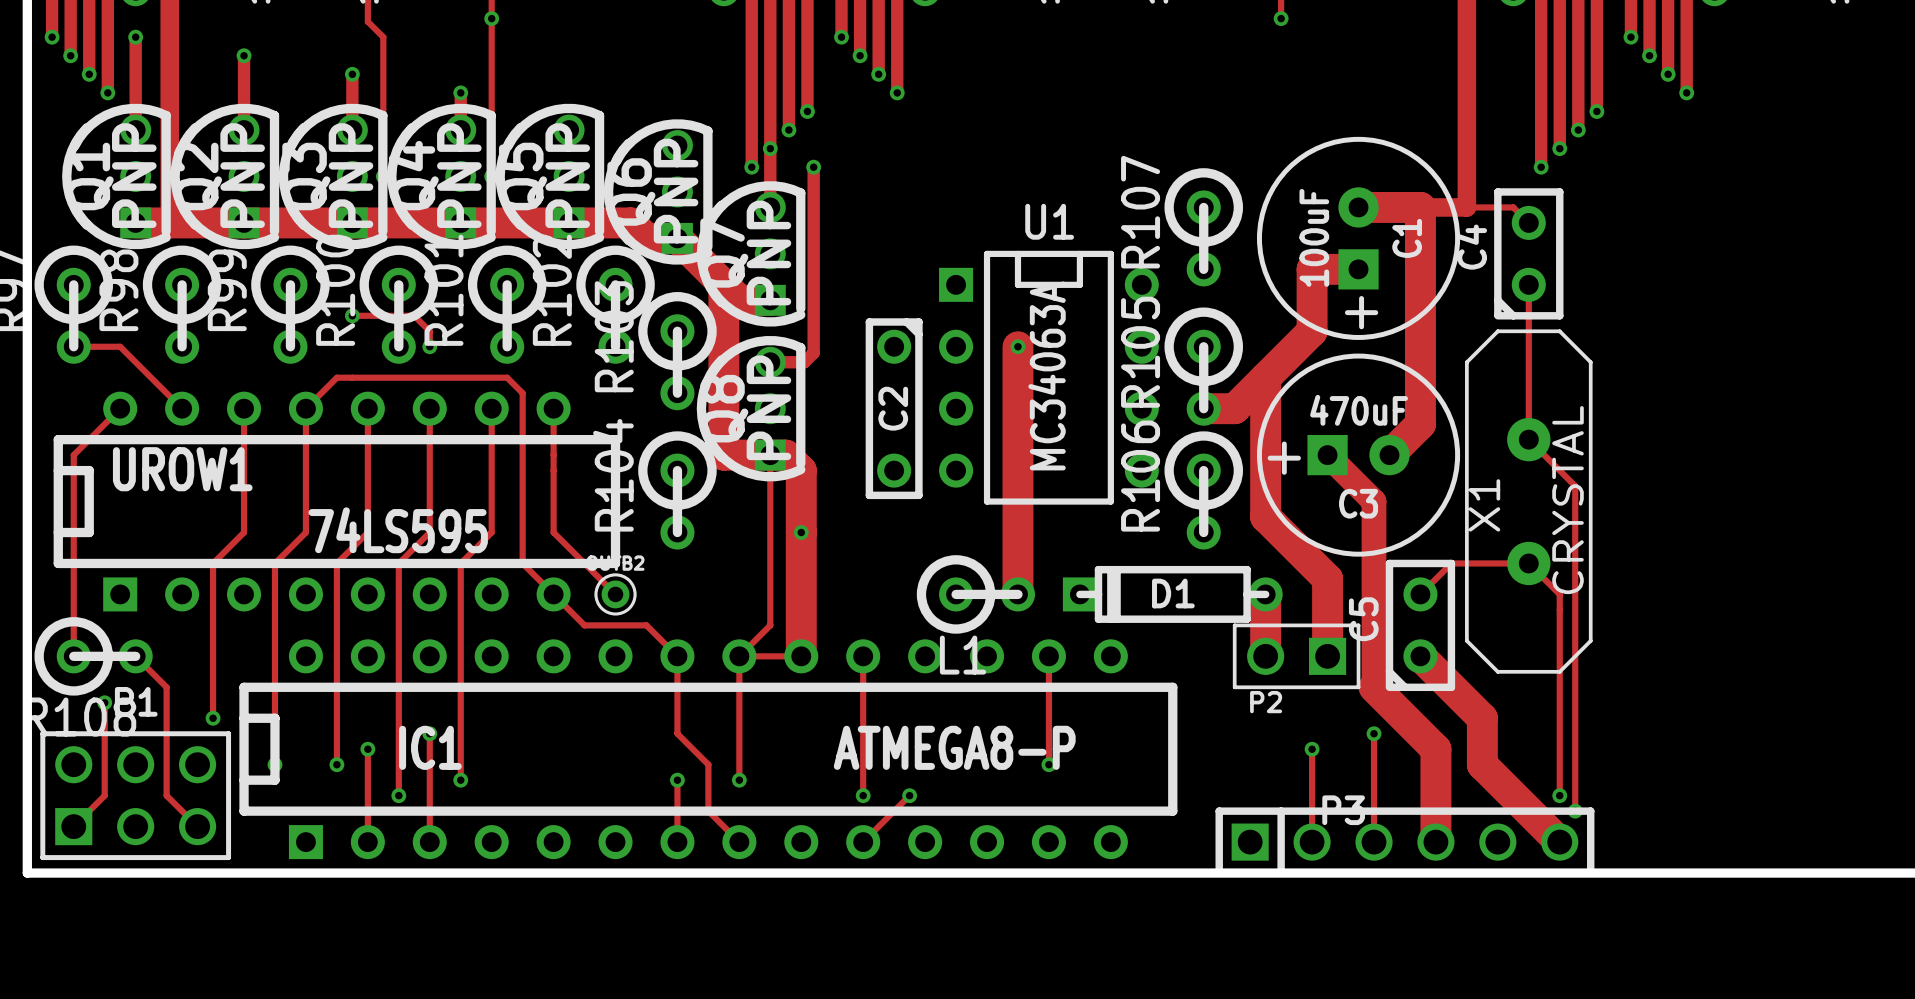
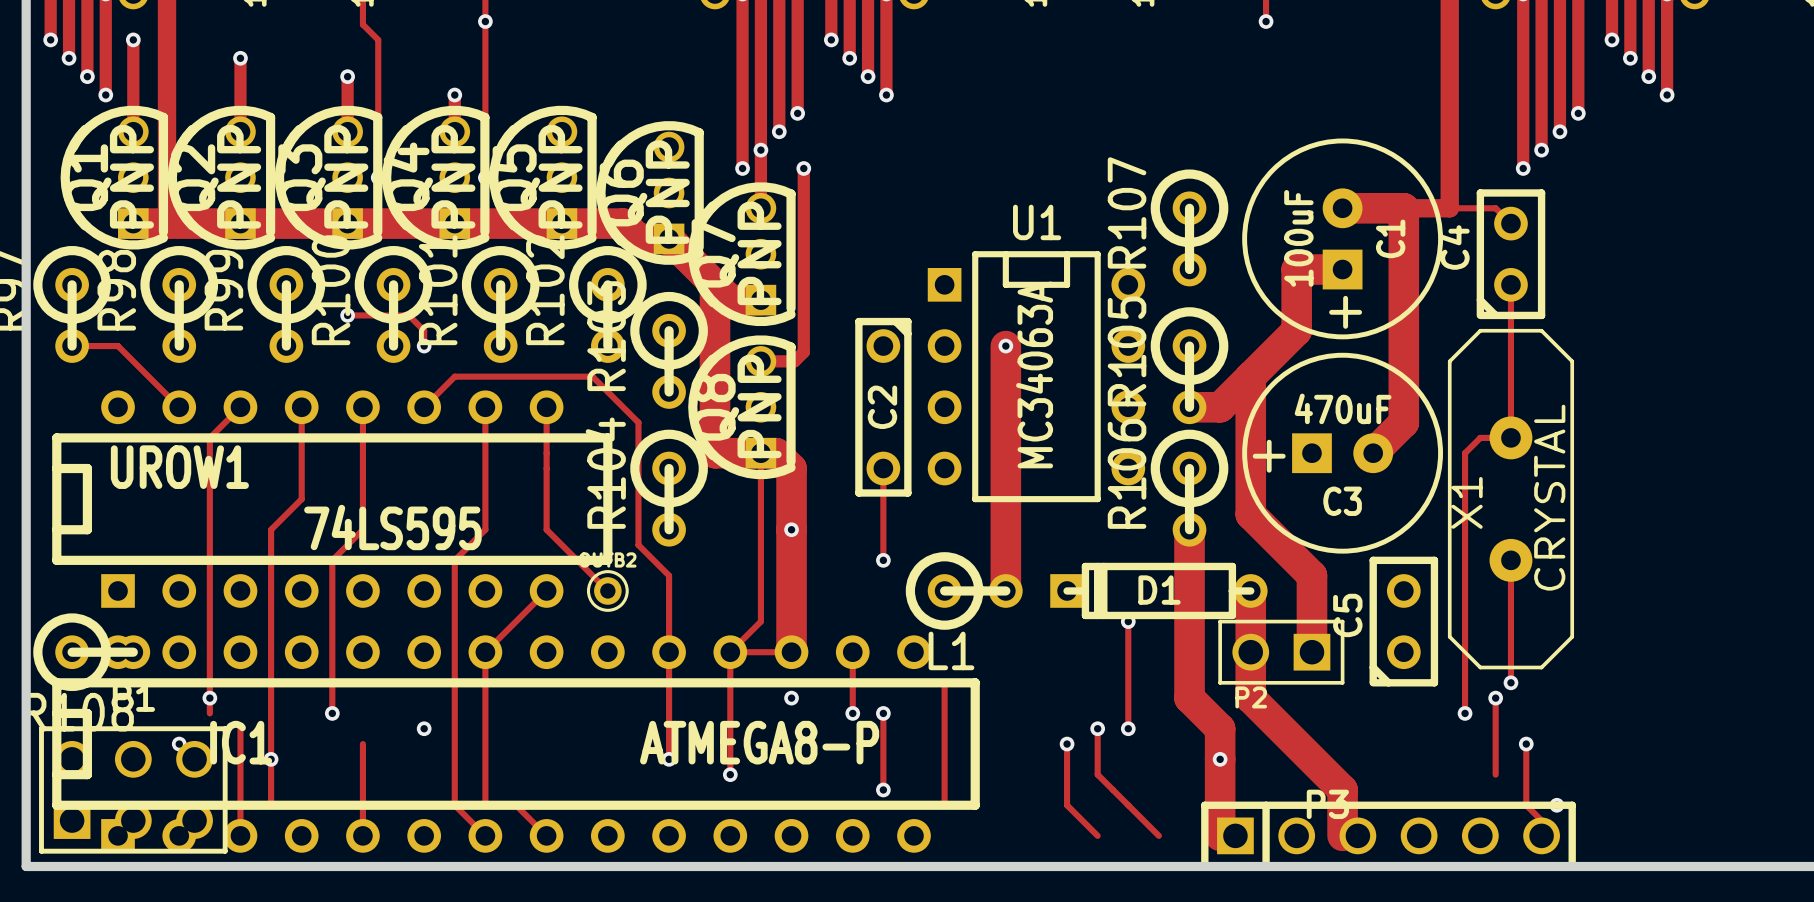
track: (460, 377) (336, 377) (305, 408) -> (454, 376) (424, 407)
track: (507, 377) (522, 393) (522, 563) (584, 625) (646, 625) (677, 656) -> (500, 376) (592, 376) (638, 422) (638, 545) (669, 575) (669, 652)
track: (120, 408) (73, 455) (73, 656) -> none
track: (244, 408) (244, 532) (213, 563) -> (240, 407) (209, 437) (209, 560)
track: (429, 408) (429, 532) (398, 563) (398, 795) -> none
track: (1528, 439) (1575, 486) (1575, 811) -> (1510, 437) (1480, 437) (1465, 453) (1465, 713)
track: (1327, 455) (1374, 501) (1374, 687) (1435, 749) (1435, 842) -> none
track: (305, 501) (305, 532) (274, 563) -> (301, 499) (271, 529) (271, 560)
track: none -> (1189, 529) (1189, 698) (1220, 728) (1220, 835)
via: none -> (883, 560)
track: none -> (1510, 560) (1510, 682)
track: none -> (546, 590) (485, 652) (485, 805) (516, 805) (546, 835)
track: (1420, 594) (1451, 563) (1528, 563) (1559, 594) (1559, 795) -> none
via: none -> (1128, 621)
track: (135, 656) (166, 687) (166, 795) (197, 826) -> none
track: (1048, 656) (1048, 764) -> (1128, 621) (1128, 728)
track: none -> (1250, 652) (1250, 698) (1342, 789) (1342, 835)
track: (1420, 656) (1482, 718) (1482, 764) (1559, 842) -> none
track: none -> (944, 682) (944, 805)
via: none -> (1510, 682)
track: (104, 702) (104, 795) (73, 826) -> none
via: (104, 702) -> none
via: none -> (791, 698)
track: none -> (1495, 698) (1495, 774)
via: none -> (1495, 698)
via position: (213, 718) -> (209, 698)
track: (336, 718) (336, 764) -> (271, 759) (271, 805)
via: none -> (332, 713)
track: (863, 718) (863, 795) -> (883, 713) (883, 789)
via: none -> (852, 713)
via: none -> (883, 713)
via: none -> (1465, 713)
track: (429, 733) (429, 842) -> (240, 728) (240, 835)
track: (677, 733) (708, 764) (708, 811) (739, 842) -> (669, 728) (669, 759)
track: none -> (1097, 728) (1097, 774) (1158, 835)
via: none -> (1097, 728)
via: none -> (1128, 728)
track: (1374, 733) (1374, 842) -> none
via: (1374, 733) -> none
via: none -> (179, 744)
via: (367, 749) -> none
IC1 position: (708, 749) -> (516, 744)
track: none -> (1067, 744) (1067, 805) (1097, 835)
via: none -> (1067, 744)
track: (1312, 749) (1312, 842) -> (883, 468) (883, 560)
via: (1312, 749) -> none
track: none -> (1526, 744) (1526, 805) (1556, 835)
via: (336, 764) -> none
via: (1048, 764) -> none
via: none -> (1220, 759)
track: none -> (454, 774) (454, 805) (485, 835)
via: (460, 780) -> none
track: (677, 780) (677, 842) -> none
via position: (677, 780) -> (669, 759)
via: (398, 795) -> none
via: (863, 795) -> none
via: none -> (883, 789)
track: (909, 795) (863, 842) -> none
via: (909, 795) -> none
via position: (1559, 795) -> (1526, 744)

